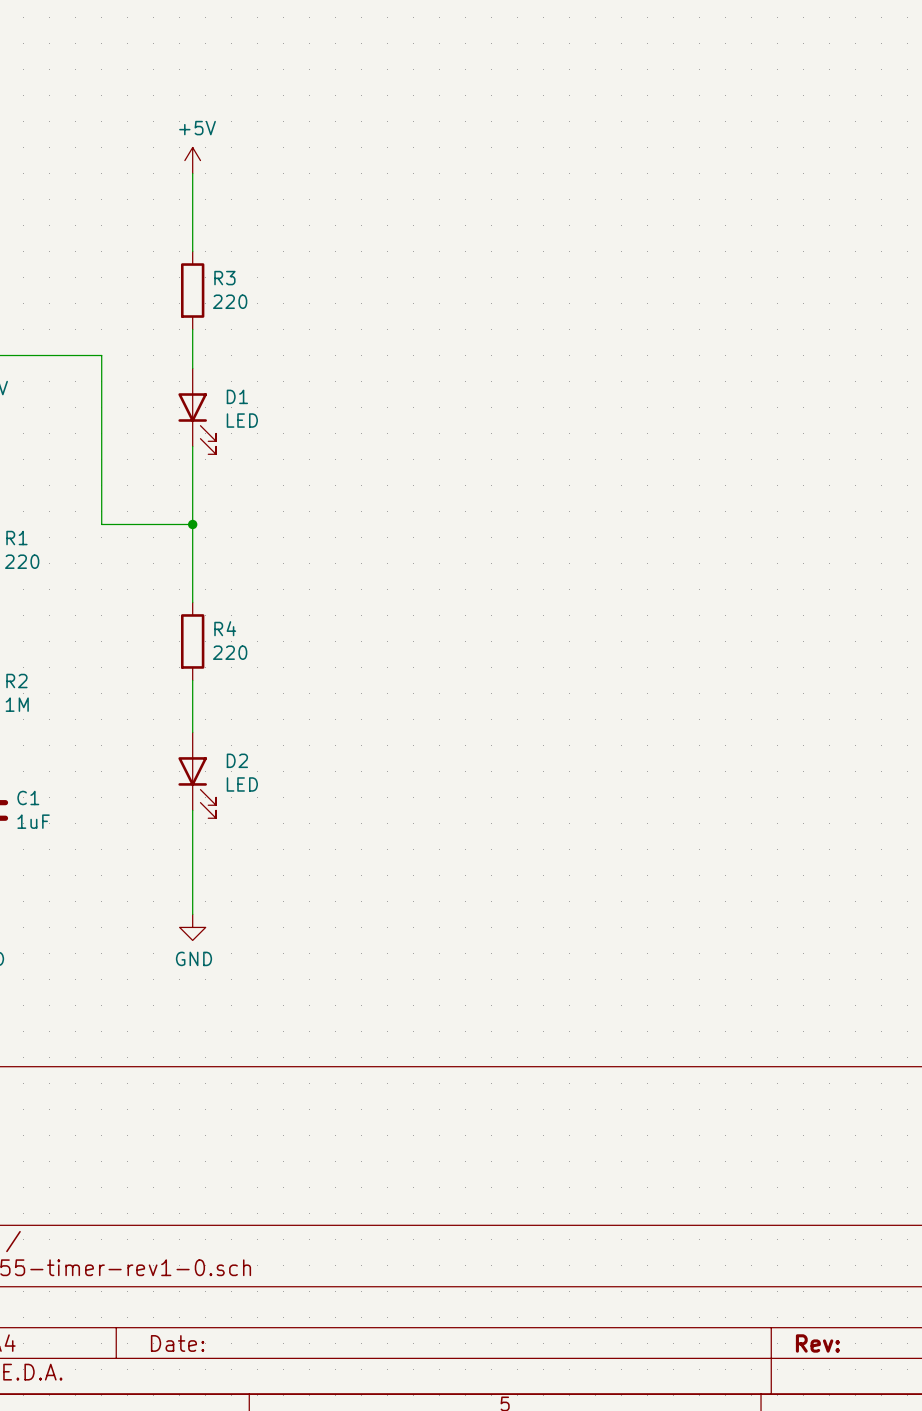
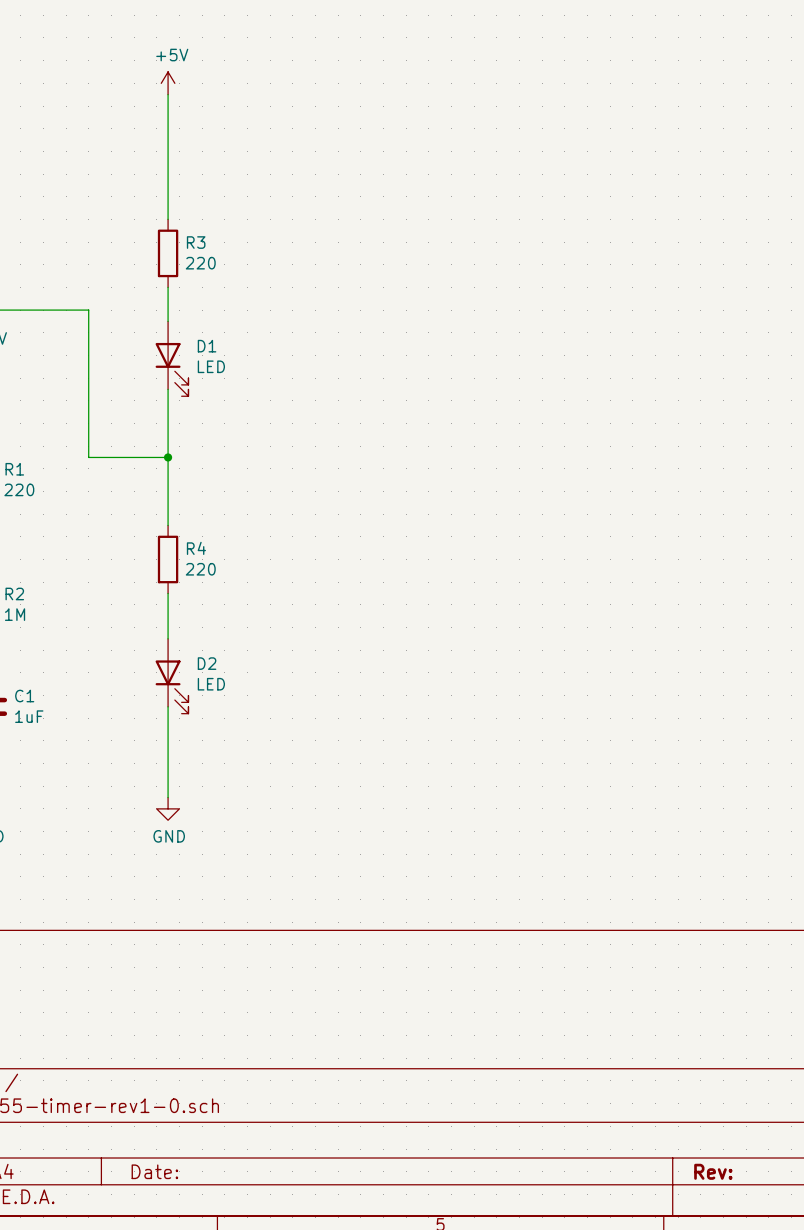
wire: none -> (168, 94) (168, 151)
power symbol position: +5V (192, 160) -> +5V (168, 83)

